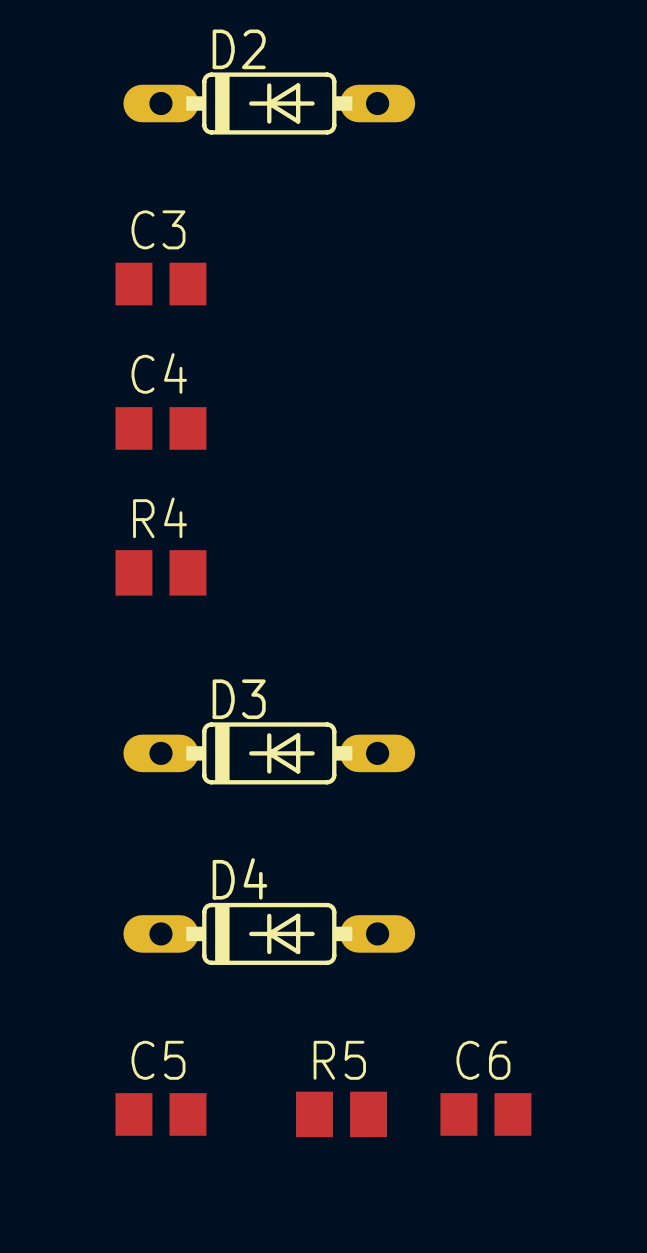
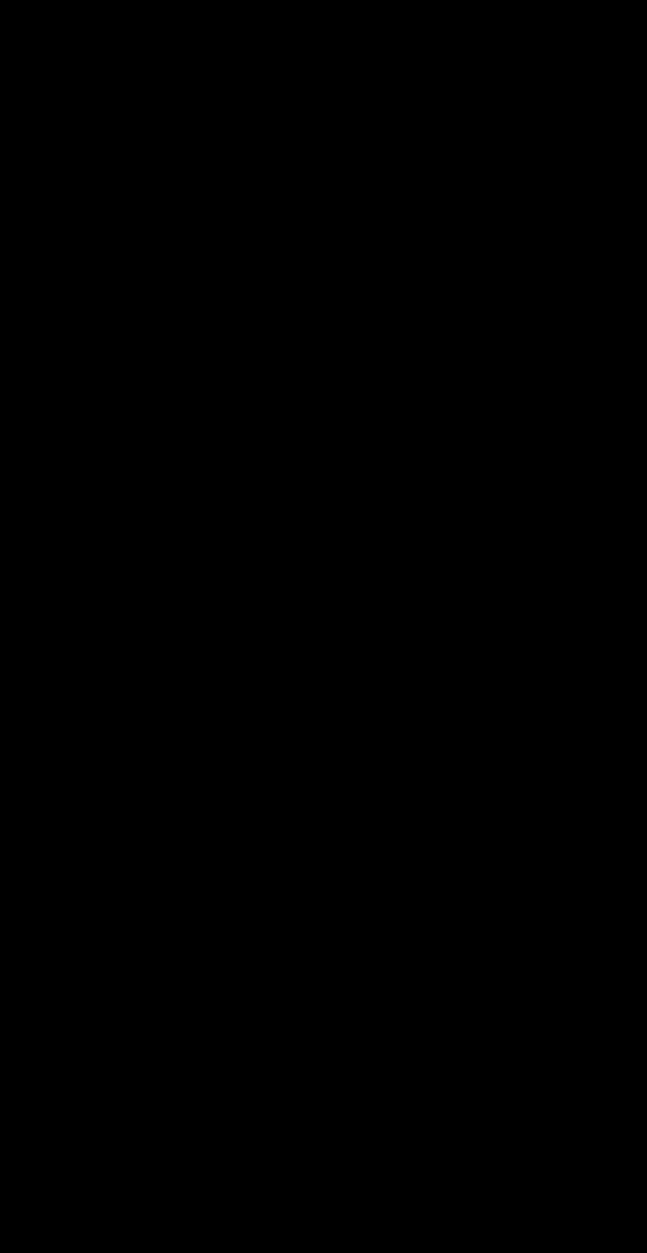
D2: (269, 103) -> none
C3: (160, 284) -> none
C4: (160, 428) -> none
R4: (160, 572) -> none
D3: (269, 753) -> none
D4: (269, 933) -> none
C5: (160, 1114) -> none
R5: (341, 1114) -> none
C6: (485, 1114) -> none

